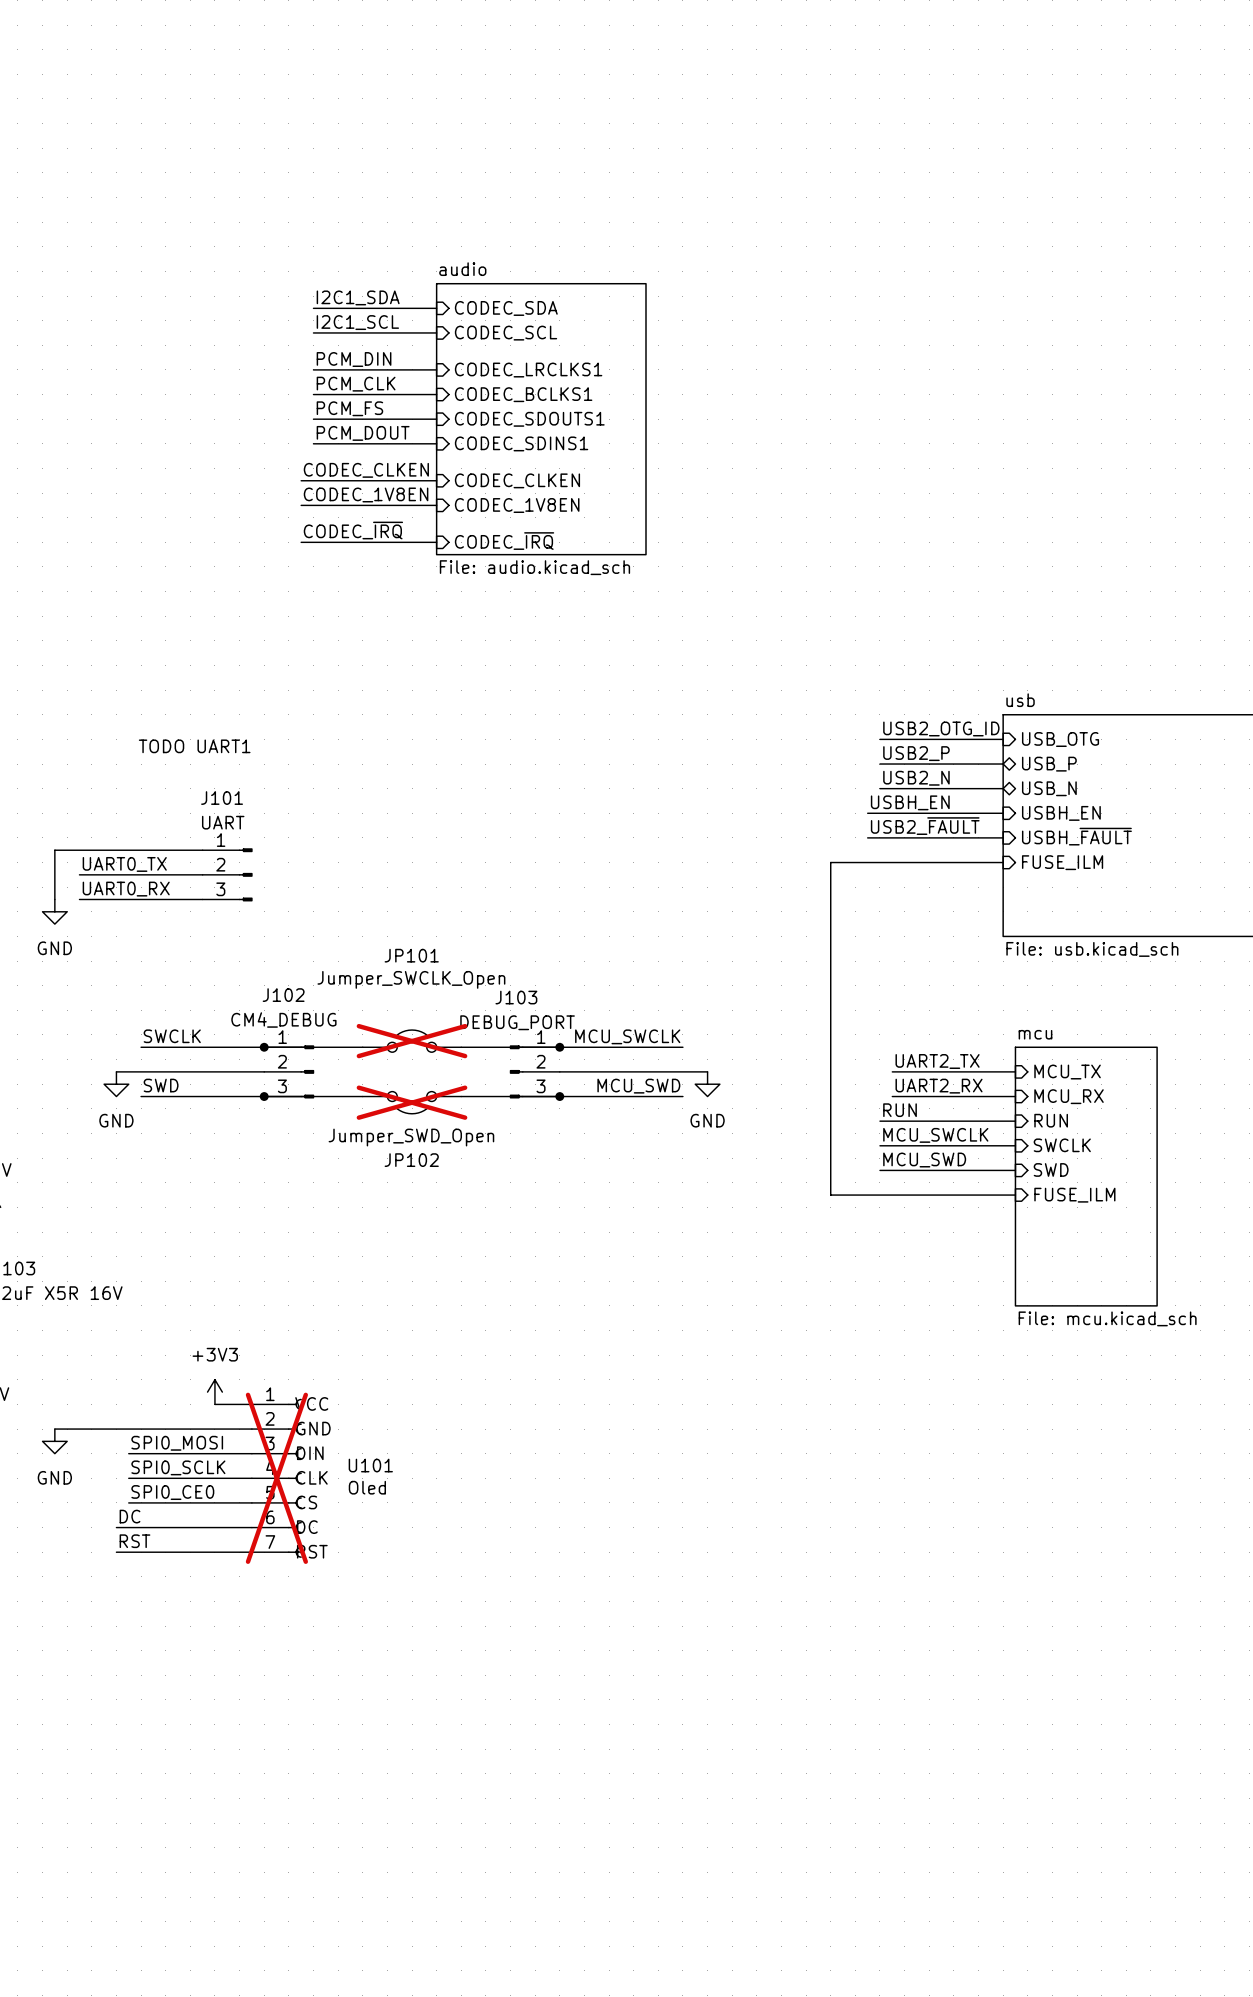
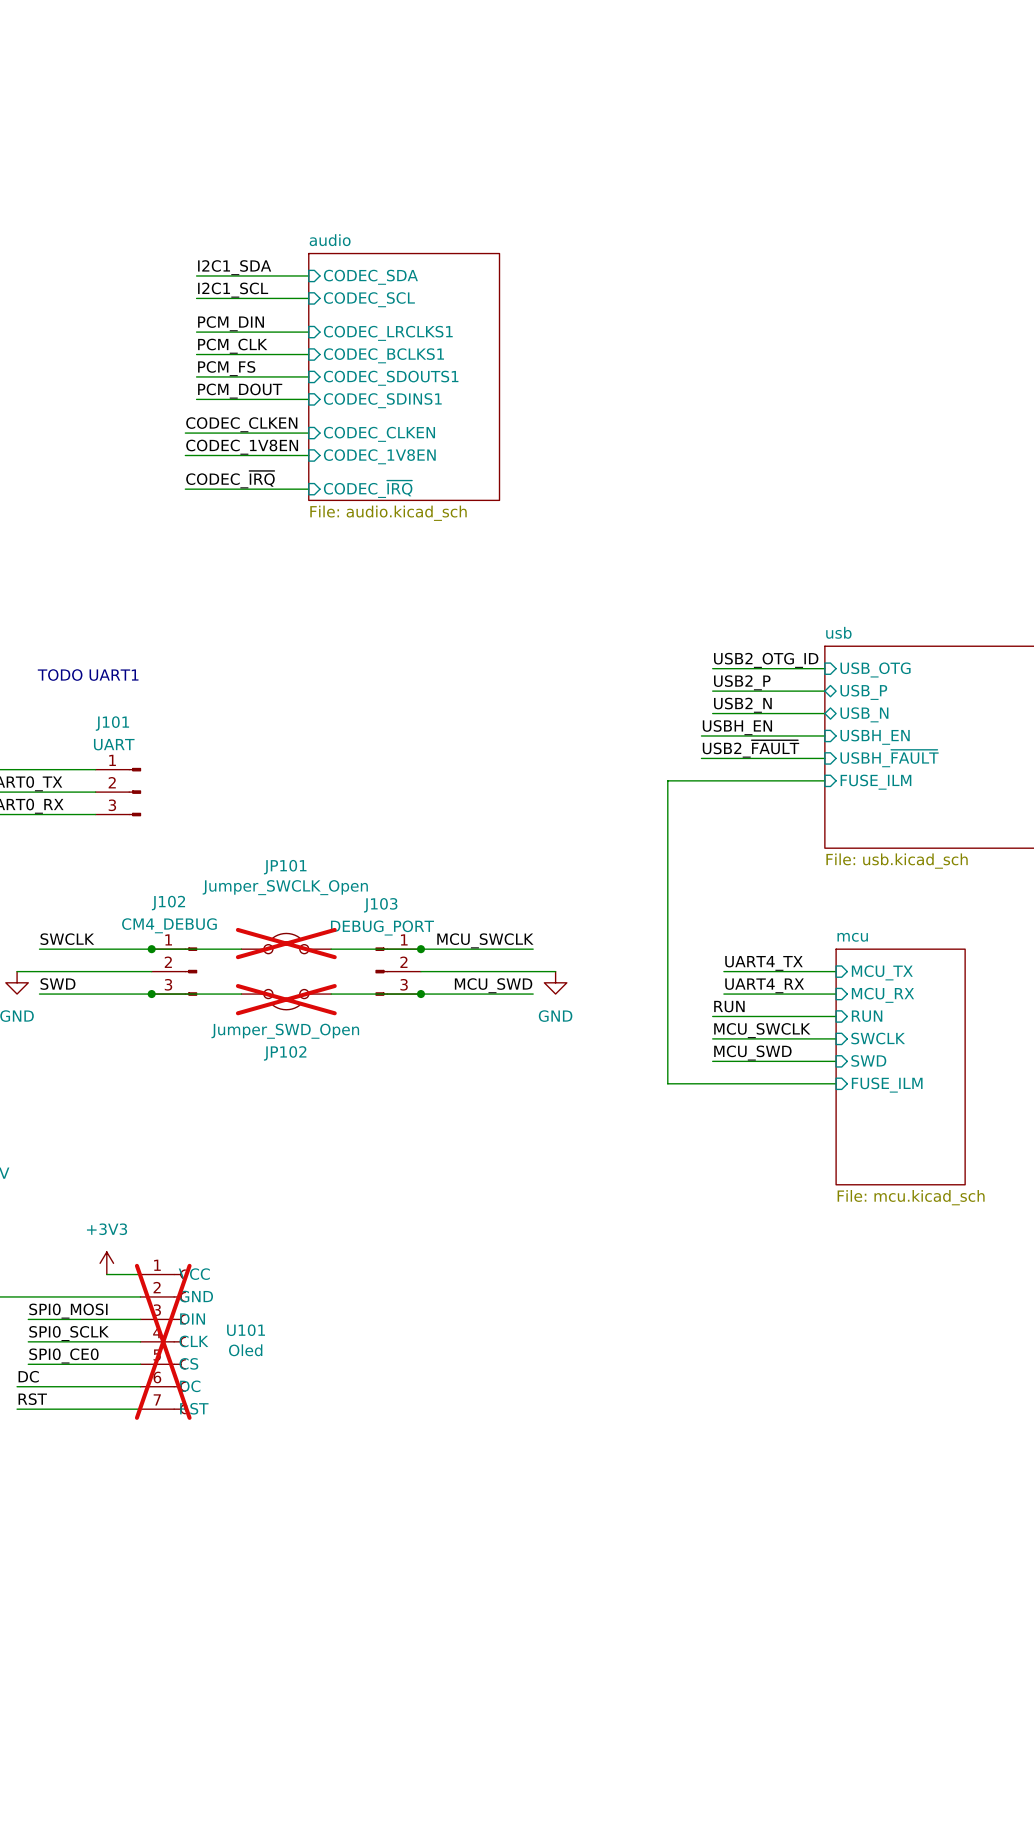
label: UART2_TX (937, 1061) -> UART4_TX (763, 963)
label: UART2_RX (939, 1086) -> UART4_RX (764, 985)

